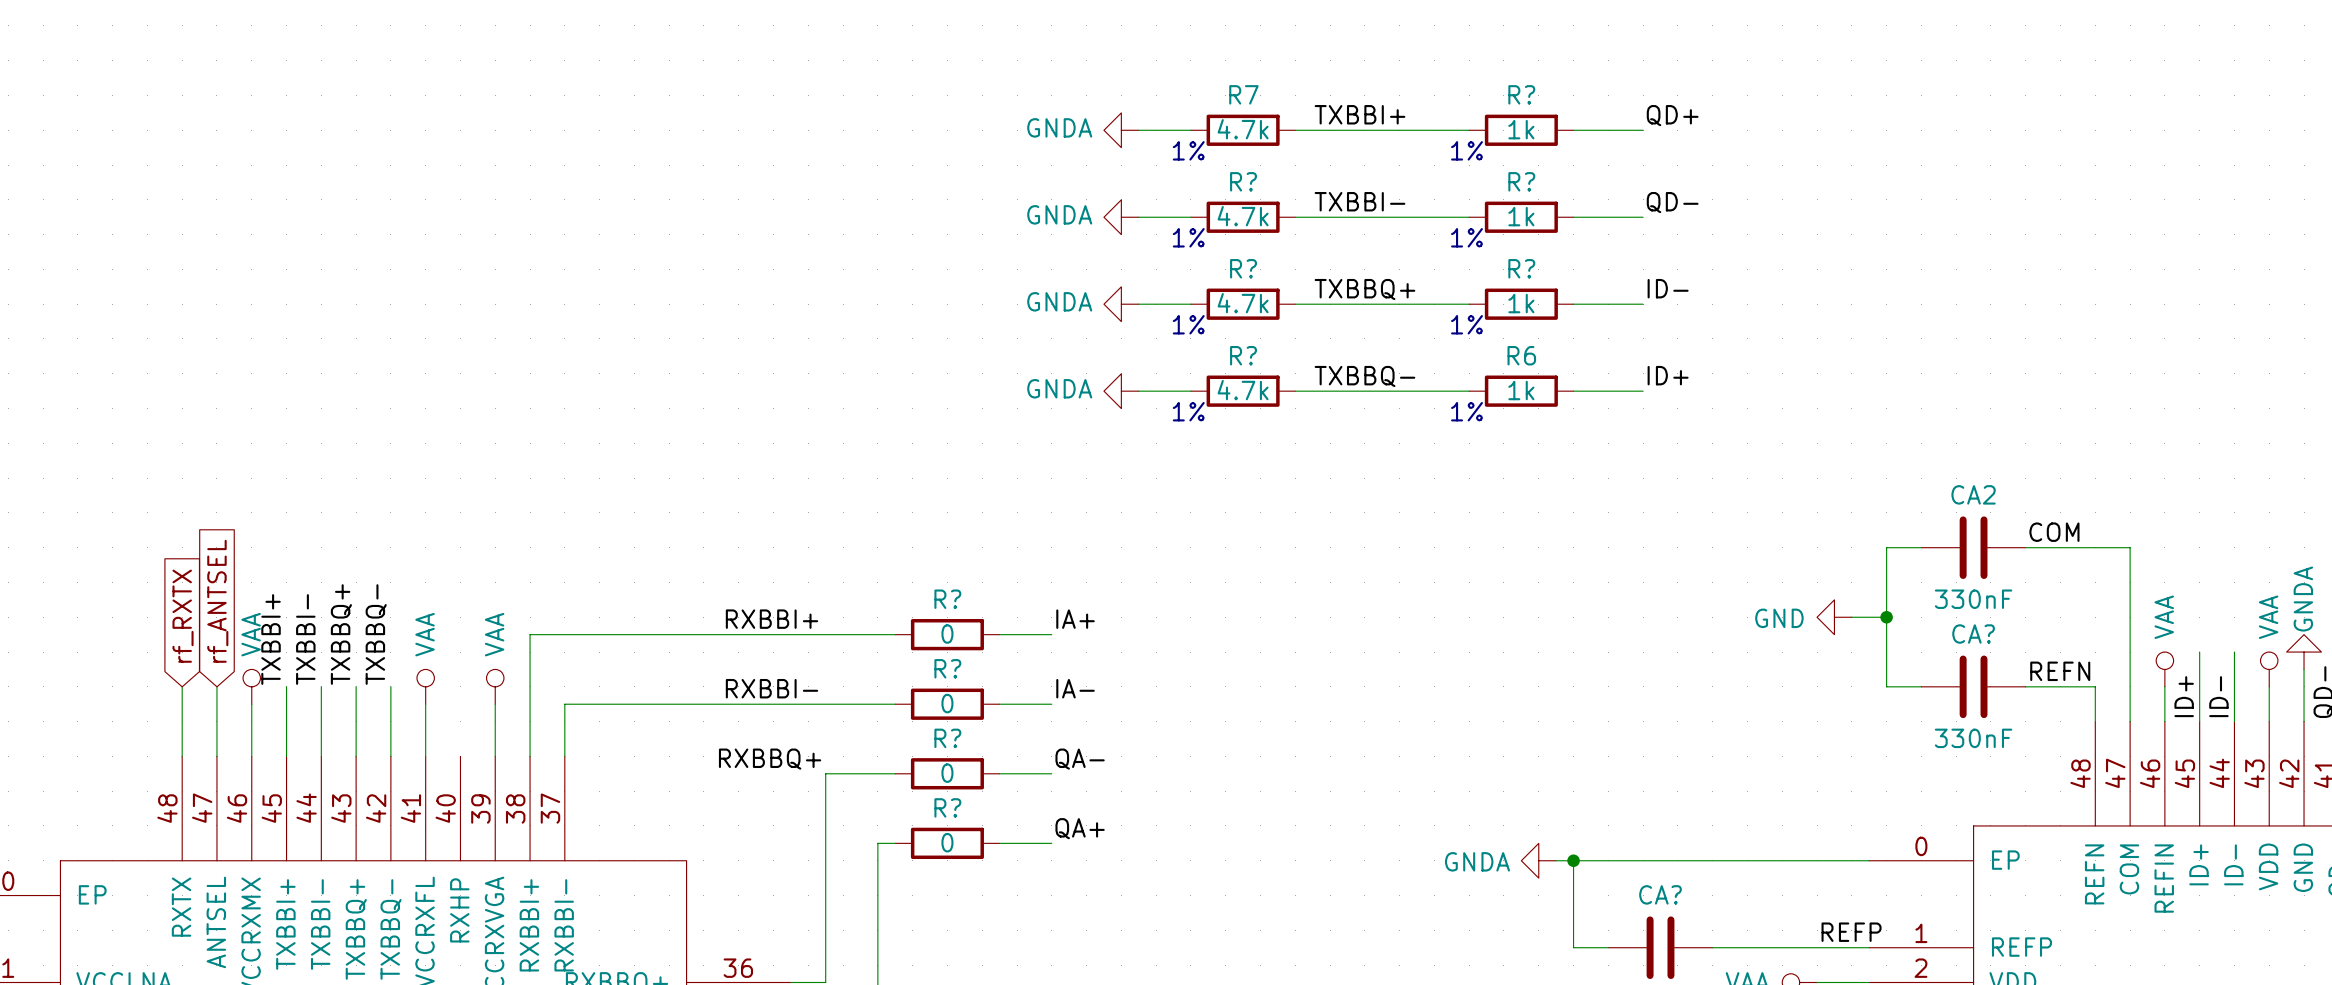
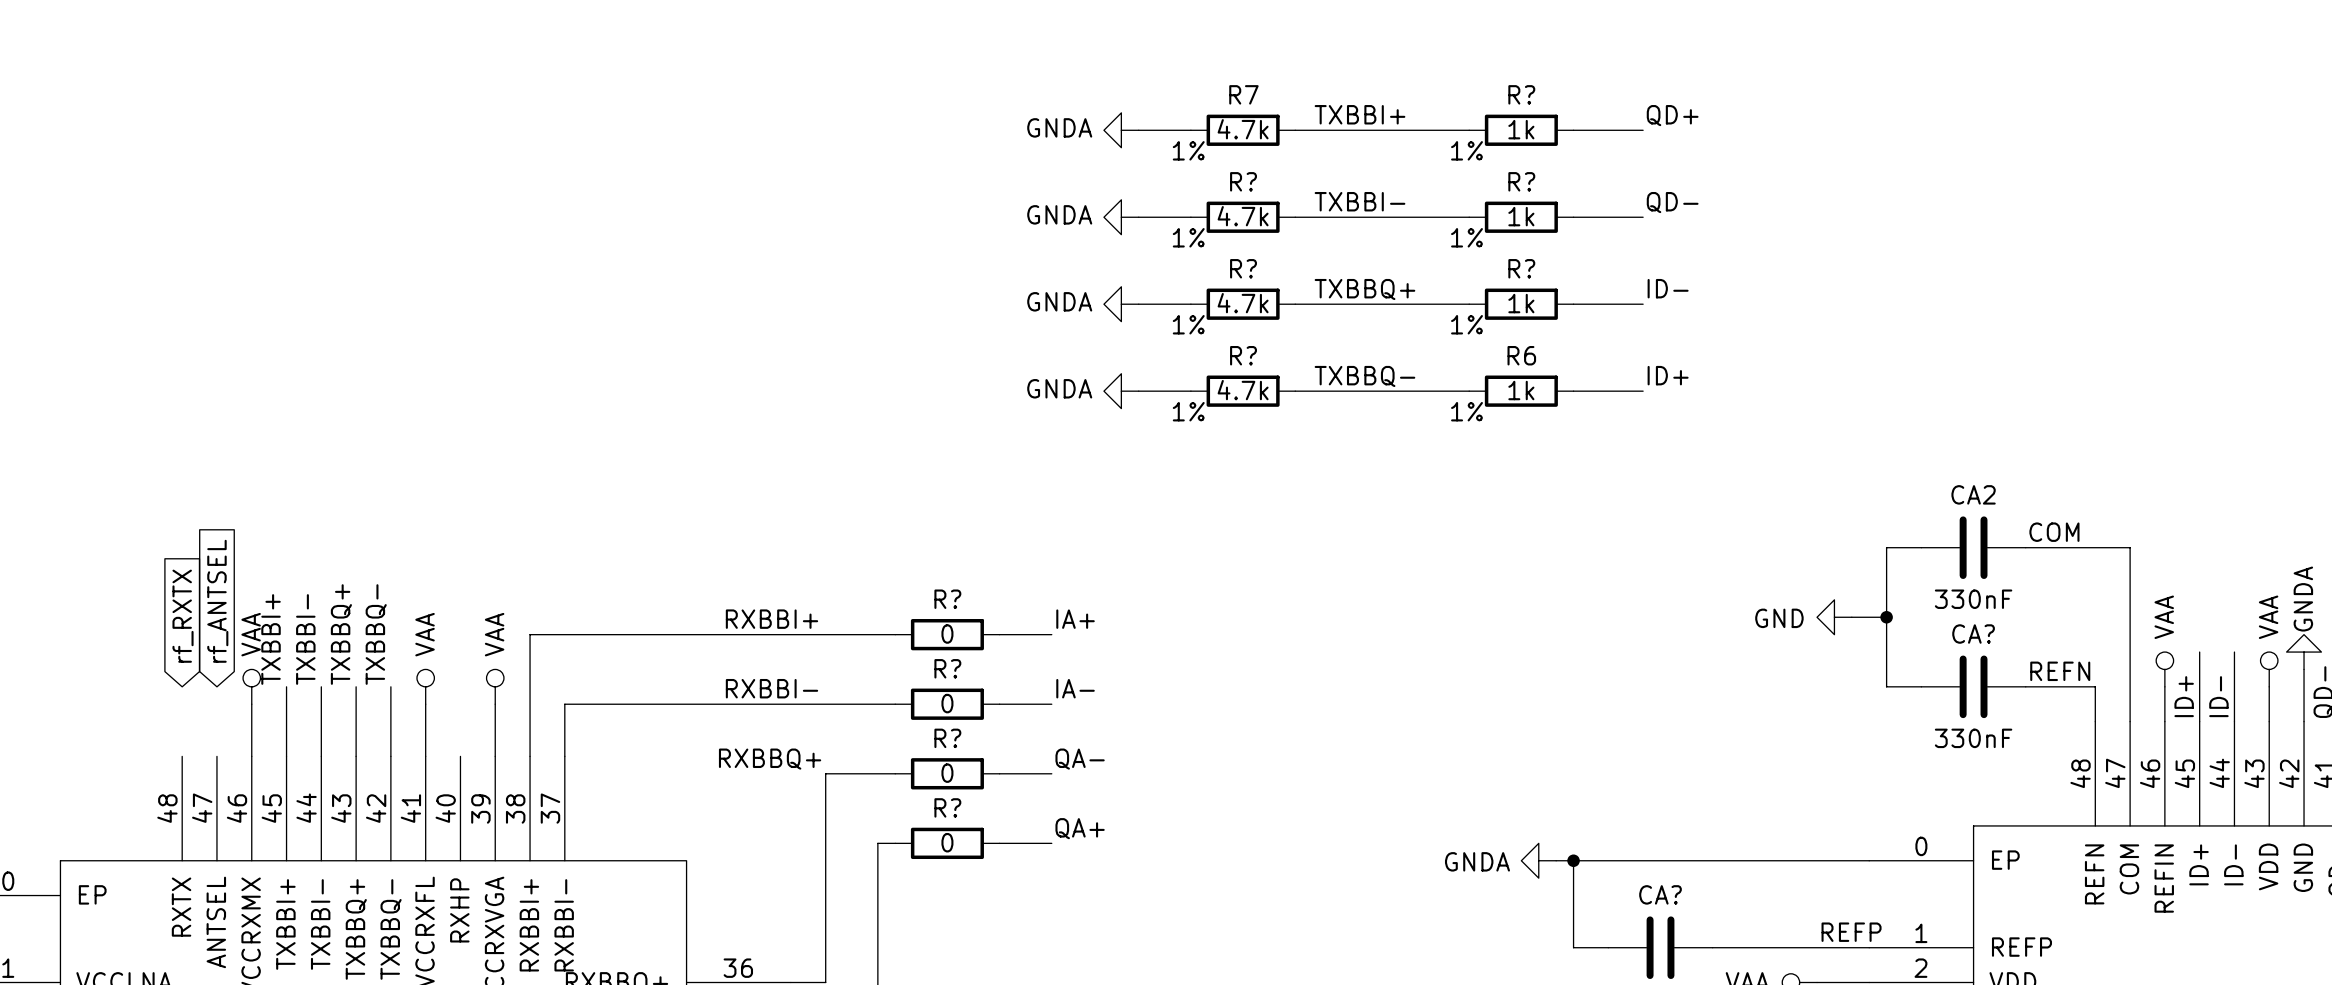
wire: (182, 686) (182, 756) -> none
wire: (216, 686) (216, 756) -> none

